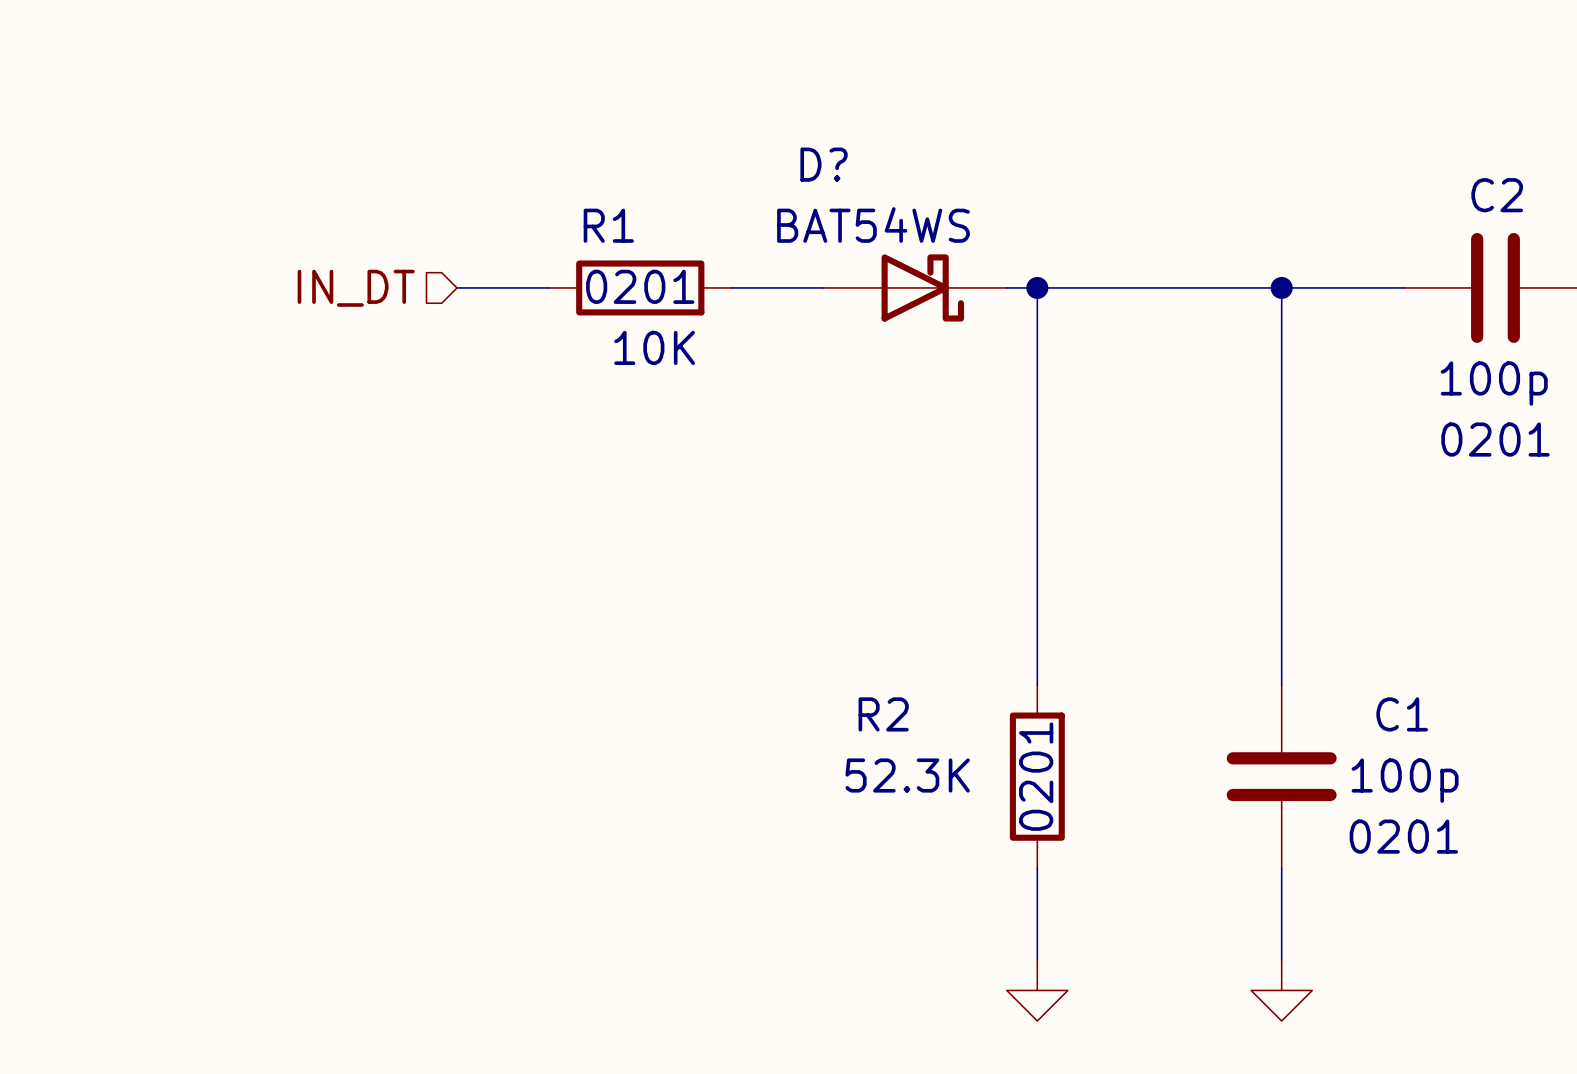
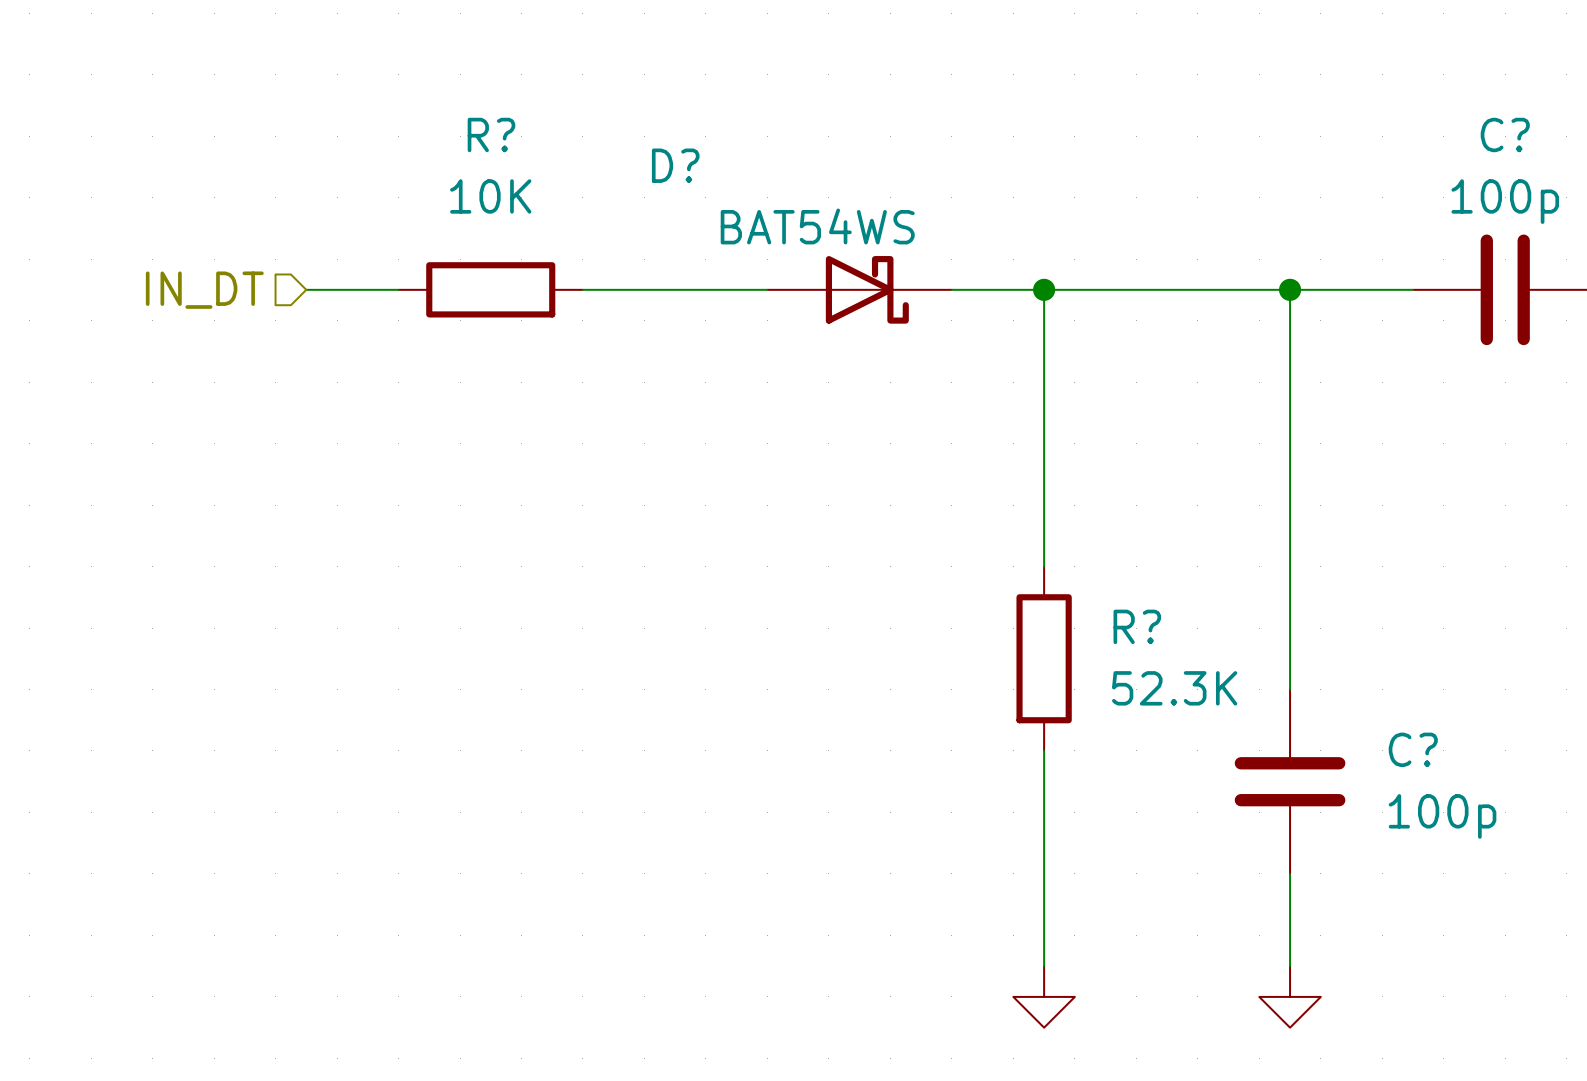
D? name position: D? (824, 164) -> D? (675, 165)
C2 name: C2 (1497, 195) -> C? (1505, 134)
wire: (457, 287) (548, 287) -> (306, 289) (398, 289)
R?: none -> 10K (490, 289)
wire: none -> (582, 289) (736, 289)
R1: 10K (640, 287) -> none
D? position: (915, 287) -> (859, 289)
hierarchical label position: IN_DT (356, 288) -> IN_DT (204, 290)
C2 value position: 100p (1494, 383) -> 100p (1505, 201)
C2 text: 0201 (1495, 439) -> none
wire: (1037, 562) (1037, 685) -> (1044, 750) (1044, 873)
R?: none -> 52.3K (1044, 658)
C1 name: C1 (1402, 714) -> C? (1413, 749)
R2: 52.3K (1037, 776) -> none
C1 value position: 100p (1405, 780) -> 100p (1442, 816)
C1 text: 0201 (1403, 836) -> none

